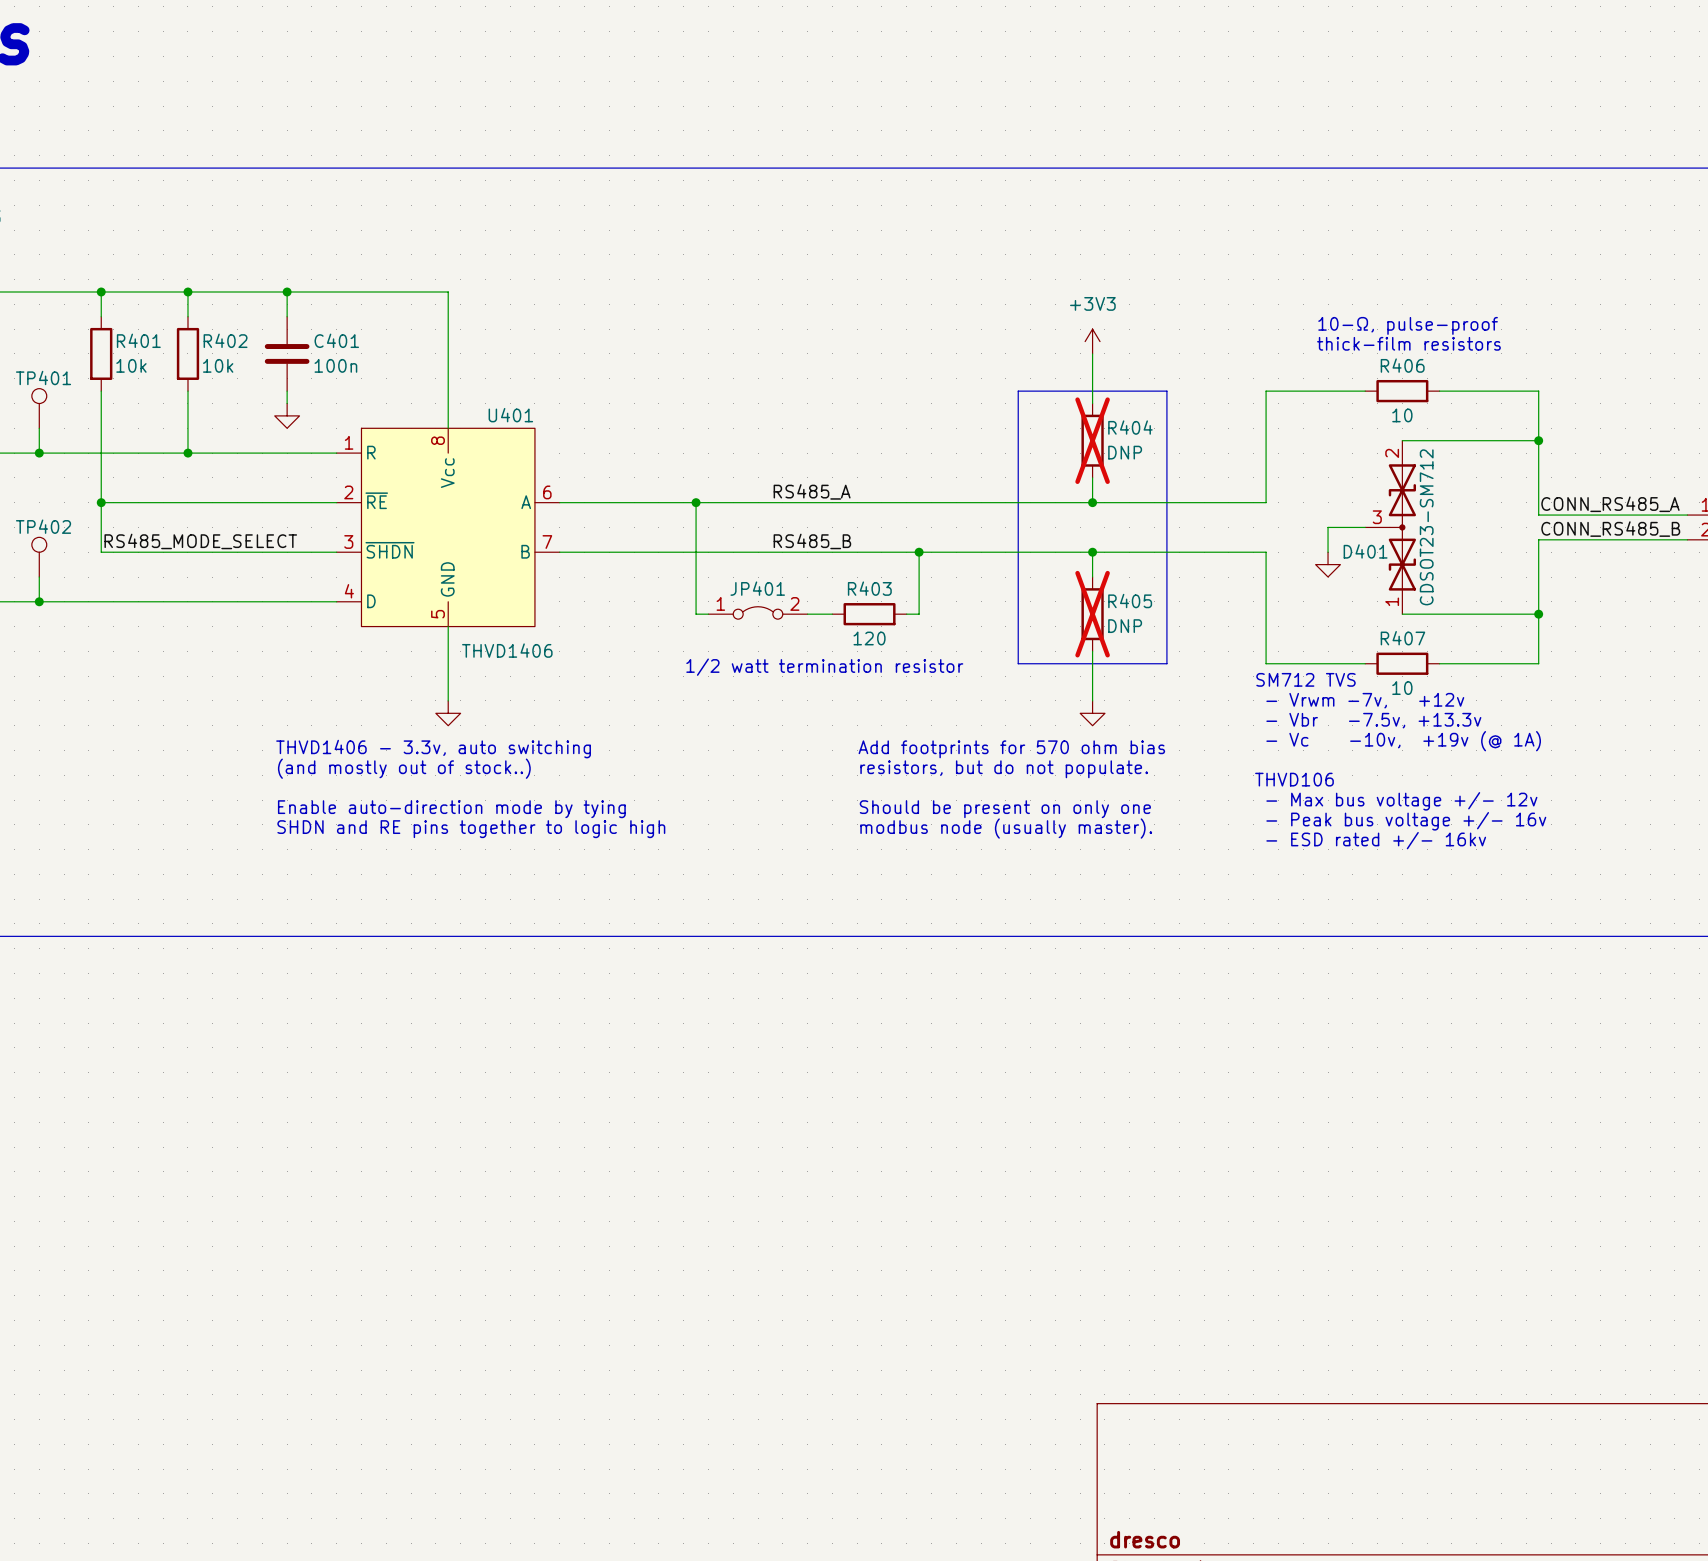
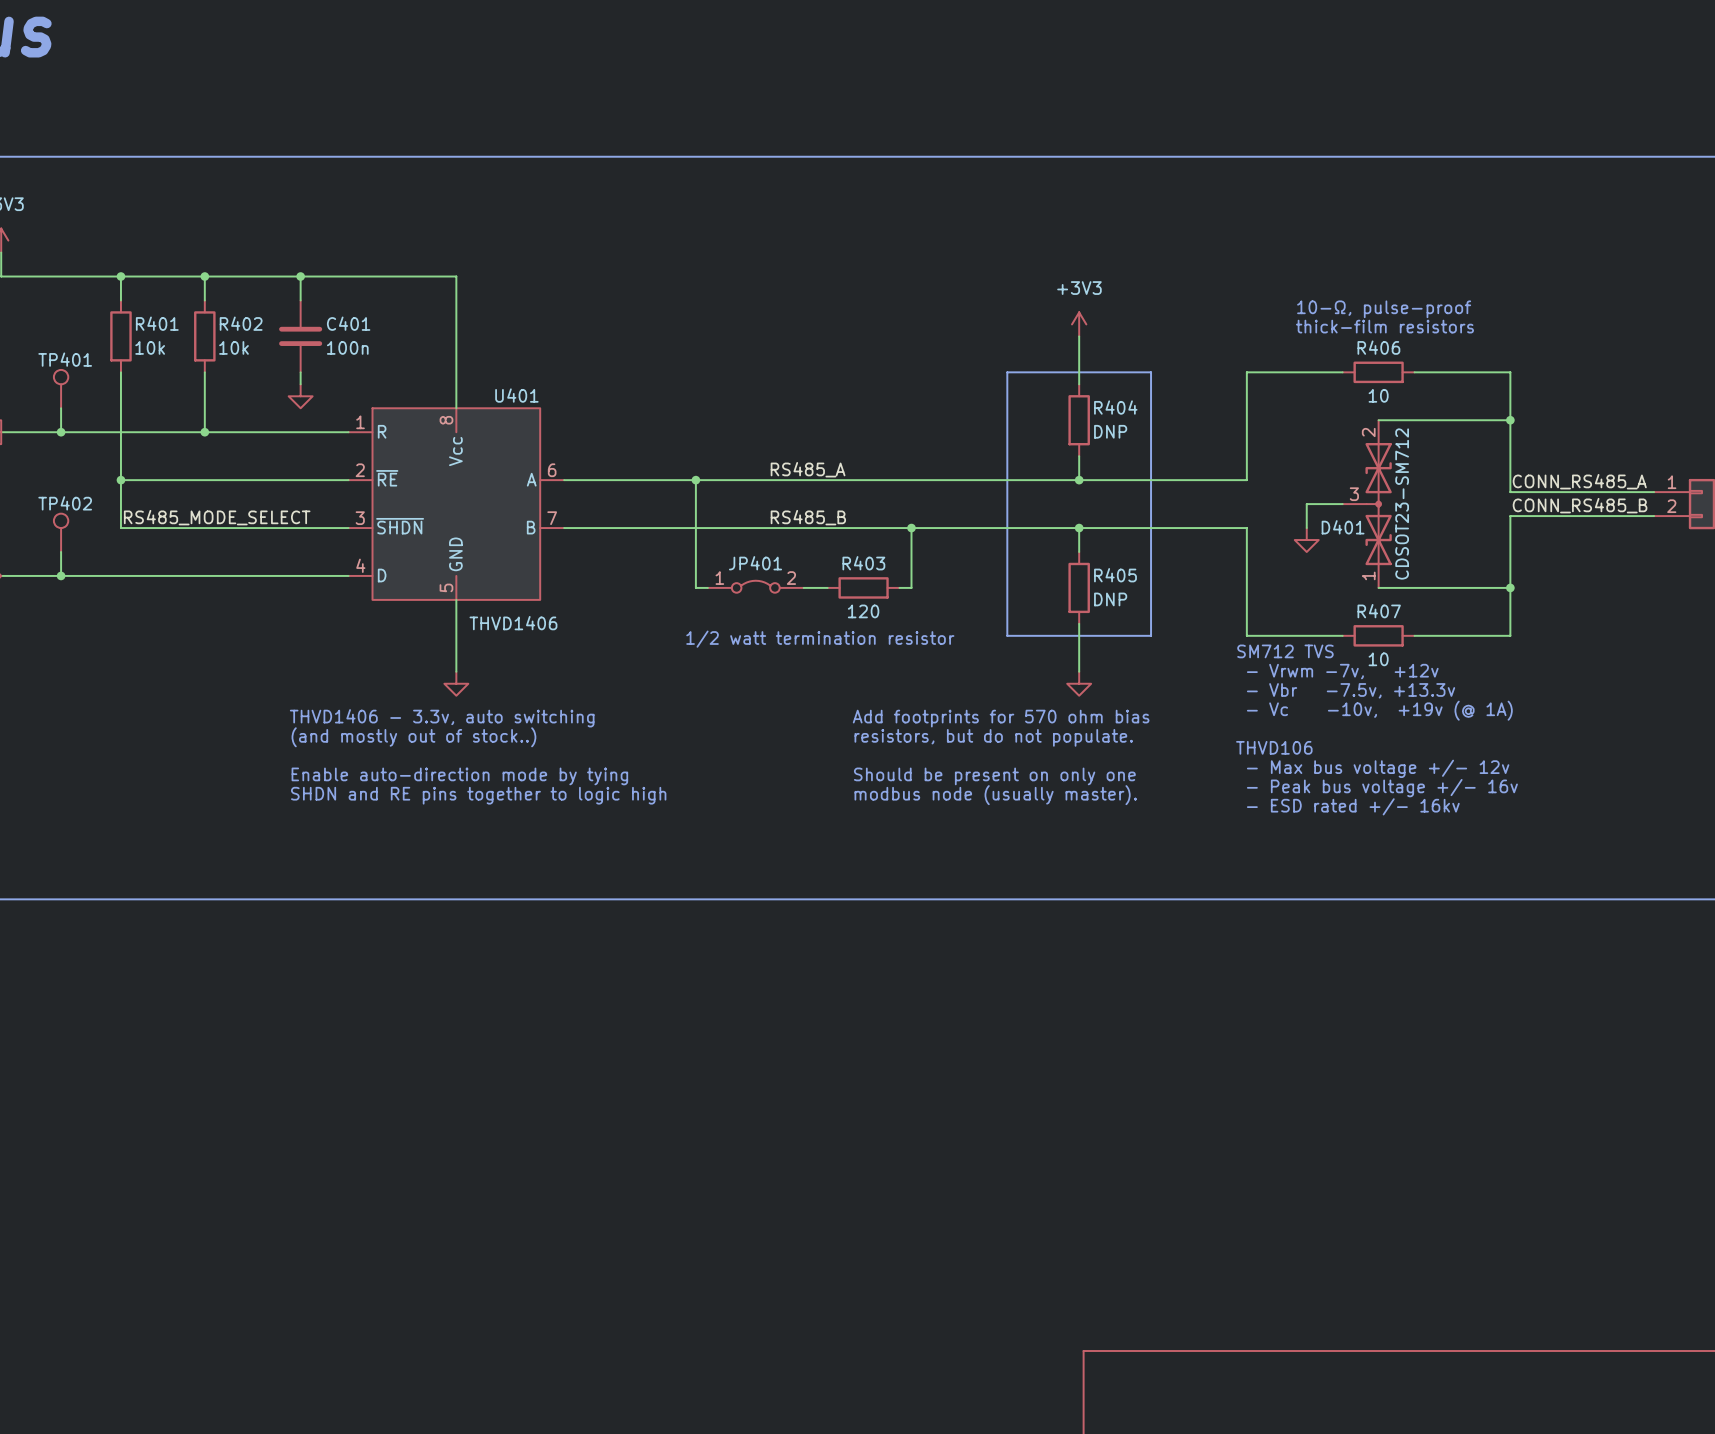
R404 do-not-place cross: (1092, 440) -> none
R405 do-not-place cross: (1092, 614) -> none

